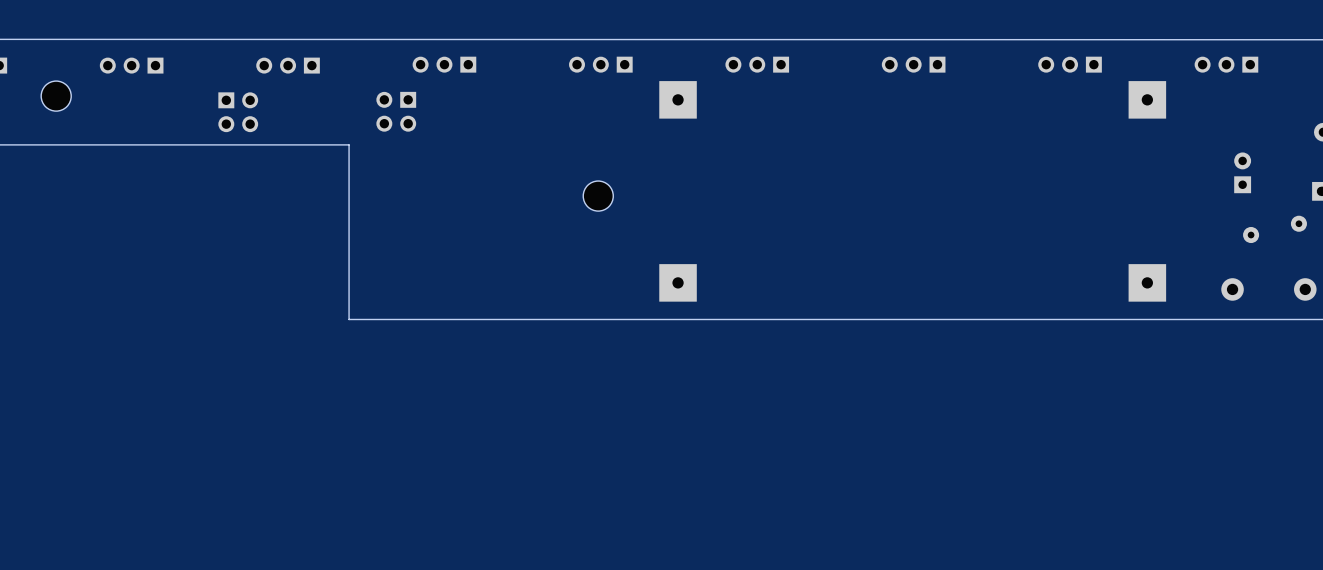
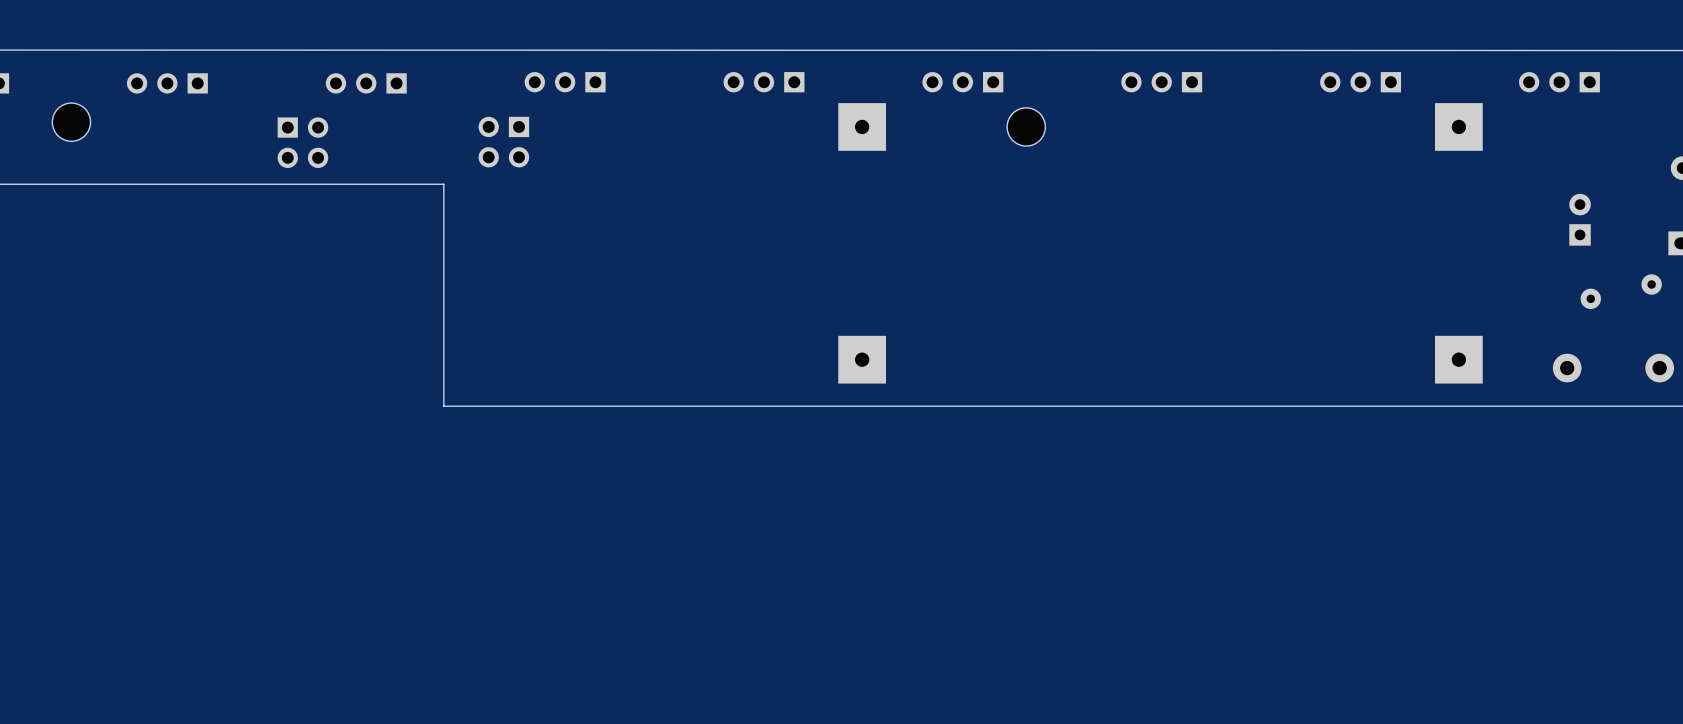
part position: (598, 196) -> (1026, 126)

